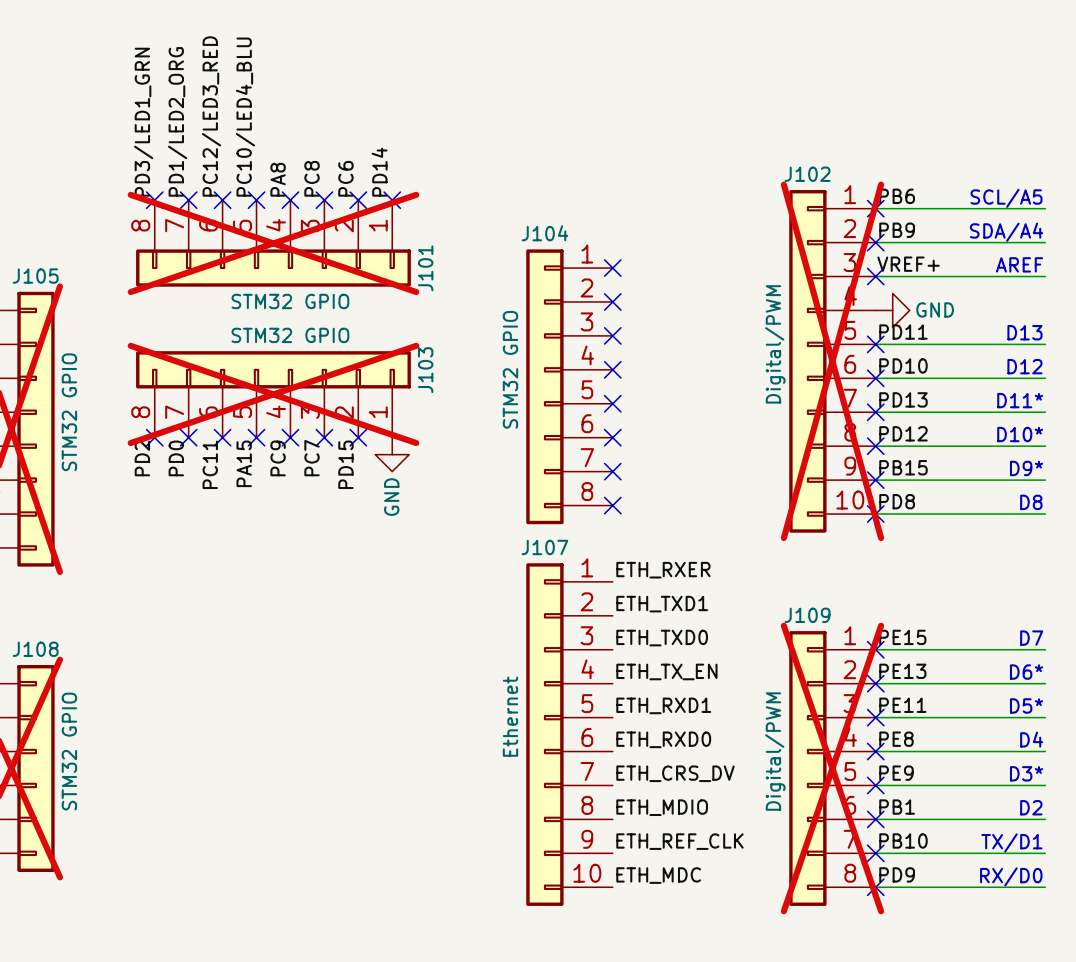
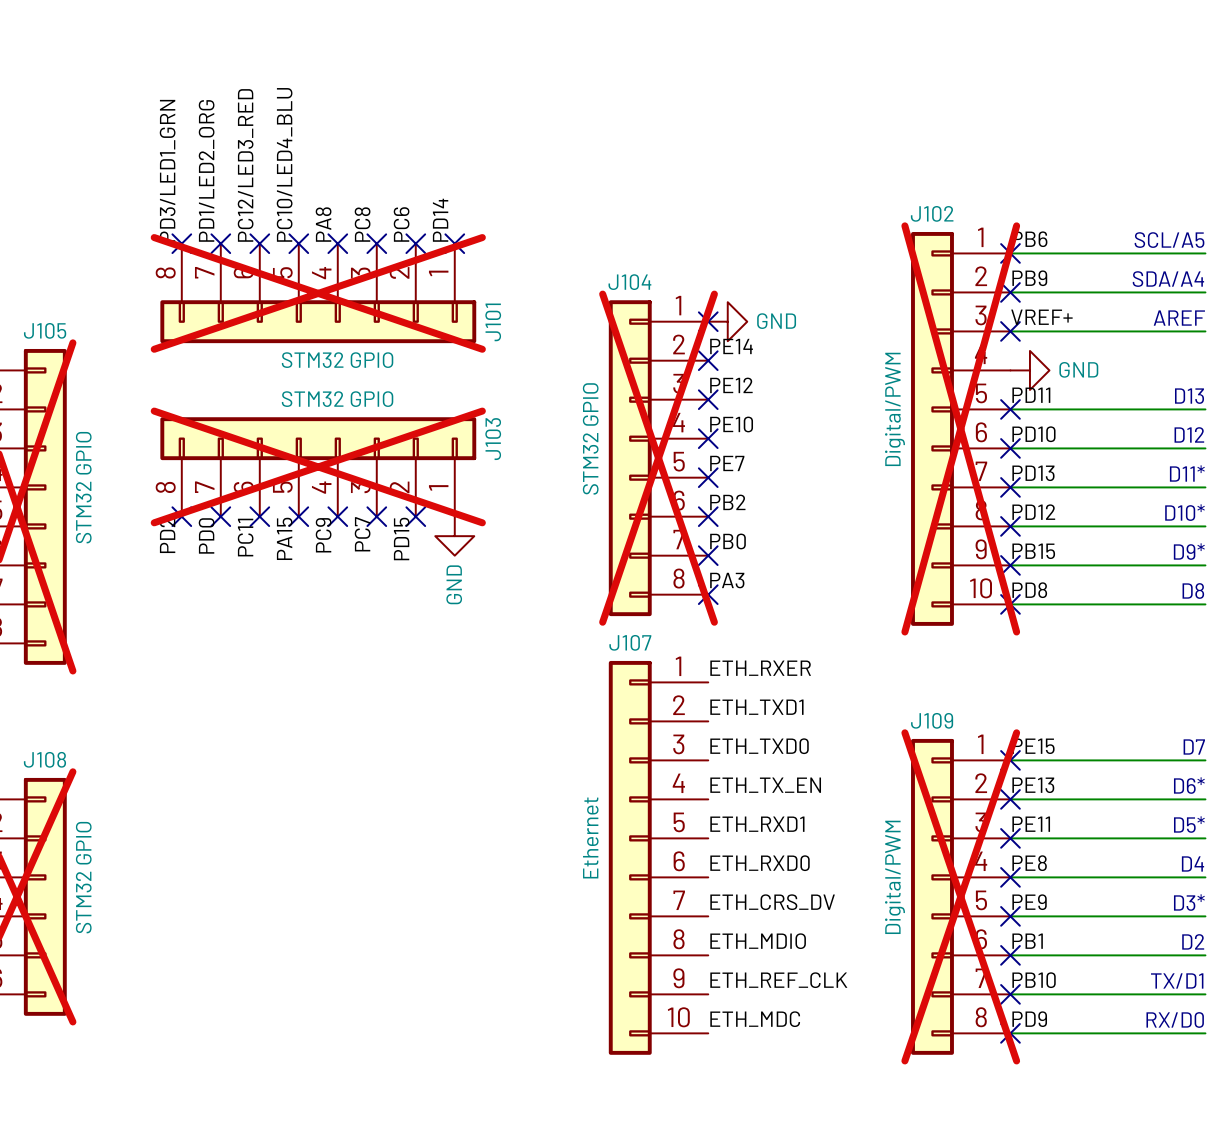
power symbol: none -> GND (727, 321)
label: none -> PE14 (731, 346)
label: none -> PE12 (731, 385)
label: none -> PE10 (731, 424)
J104 do-not-place cross: none -> (658, 458)
label: none -> PE7 (727, 463)
label: none -> PB2 (727, 502)
label: none -> PB0 (727, 541)
label: none -> PA3 (727, 580)

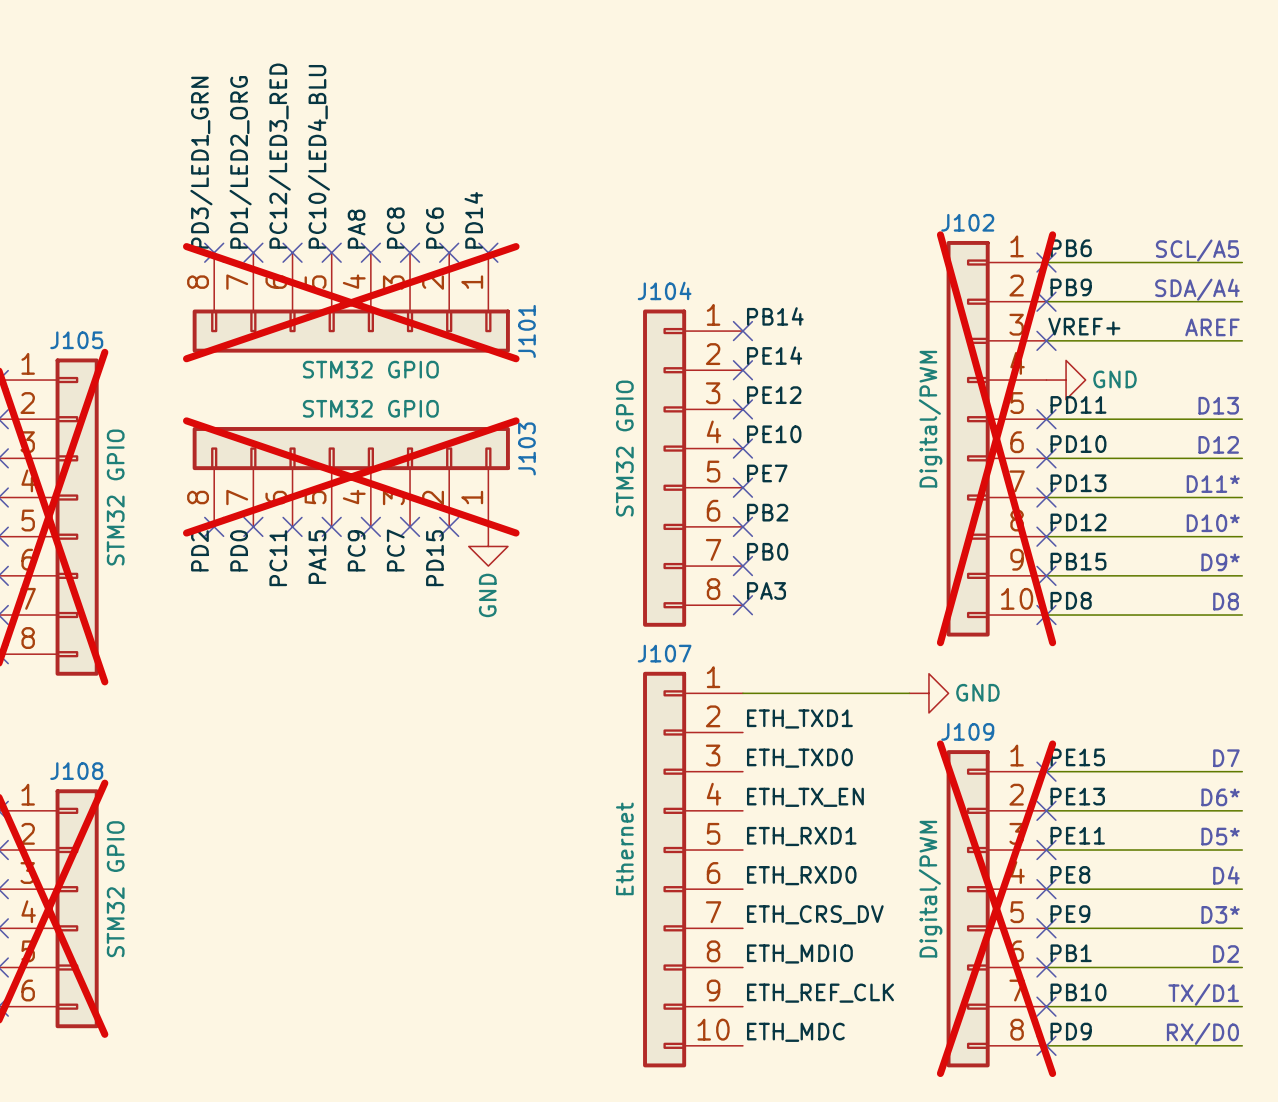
label: none -> PB14 (775, 316)
power symbol: GND (727, 321) -> none
J104 do-not-place cross: (658, 458) -> none
label: ETH_RXER (760, 668) -> none
wire: none -> (742, 693) (909, 693)
power symbol: none -> GND (928, 693)

